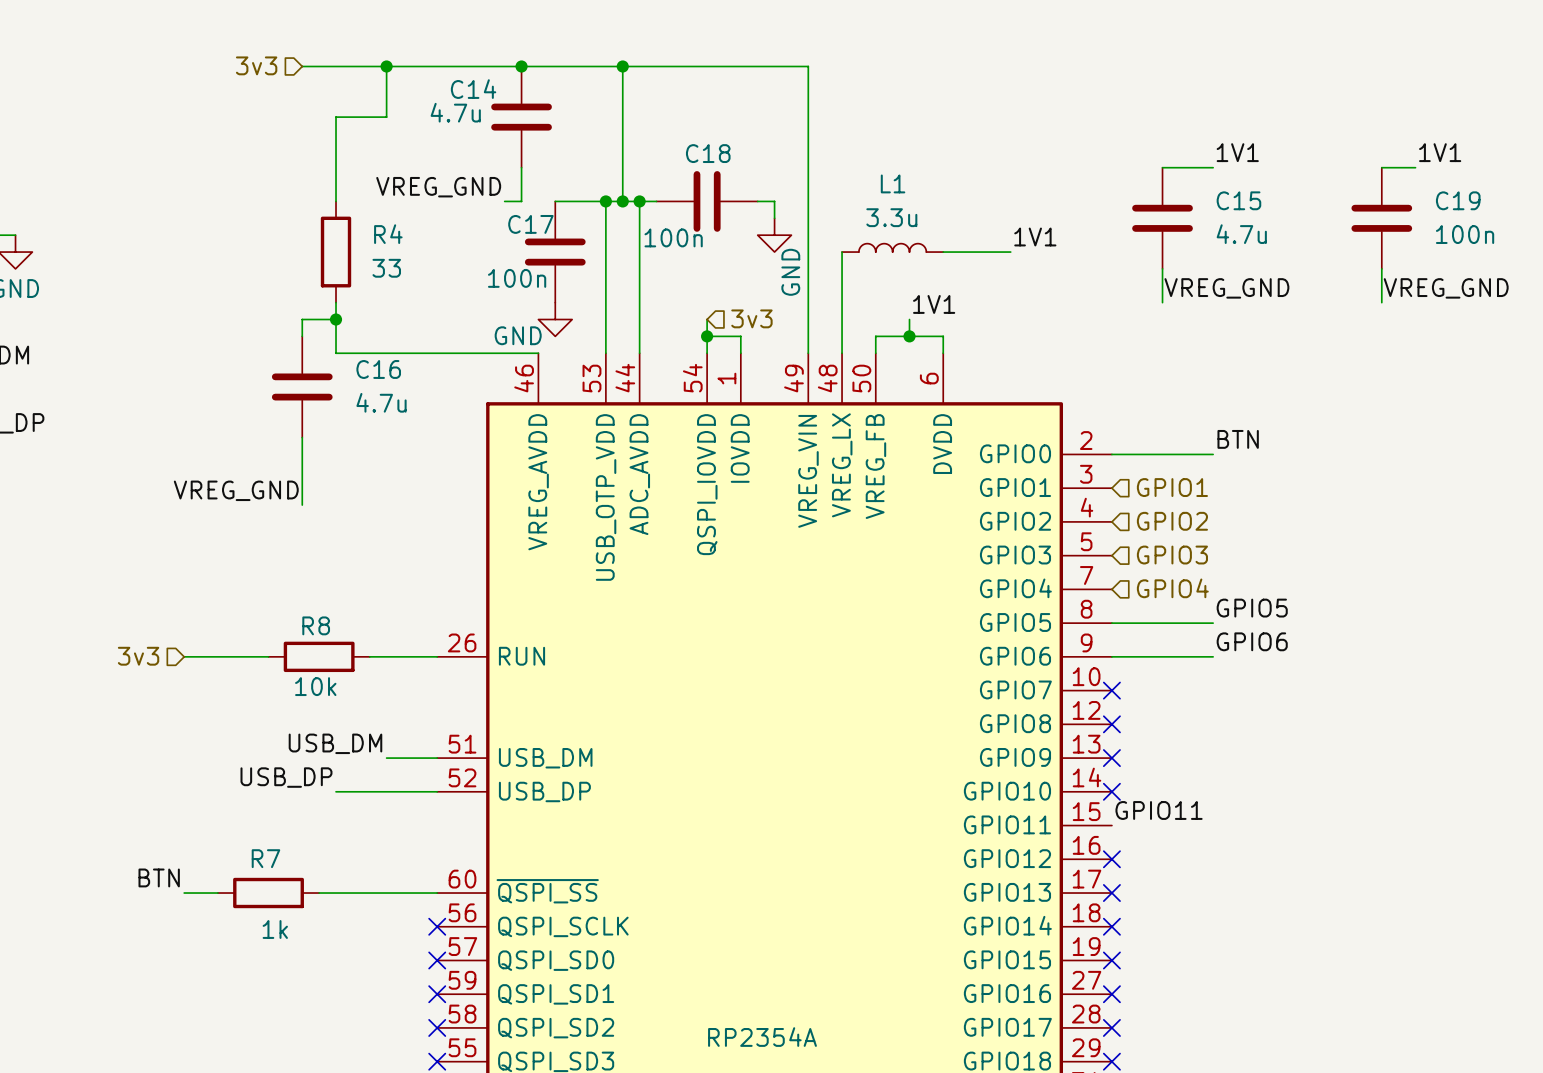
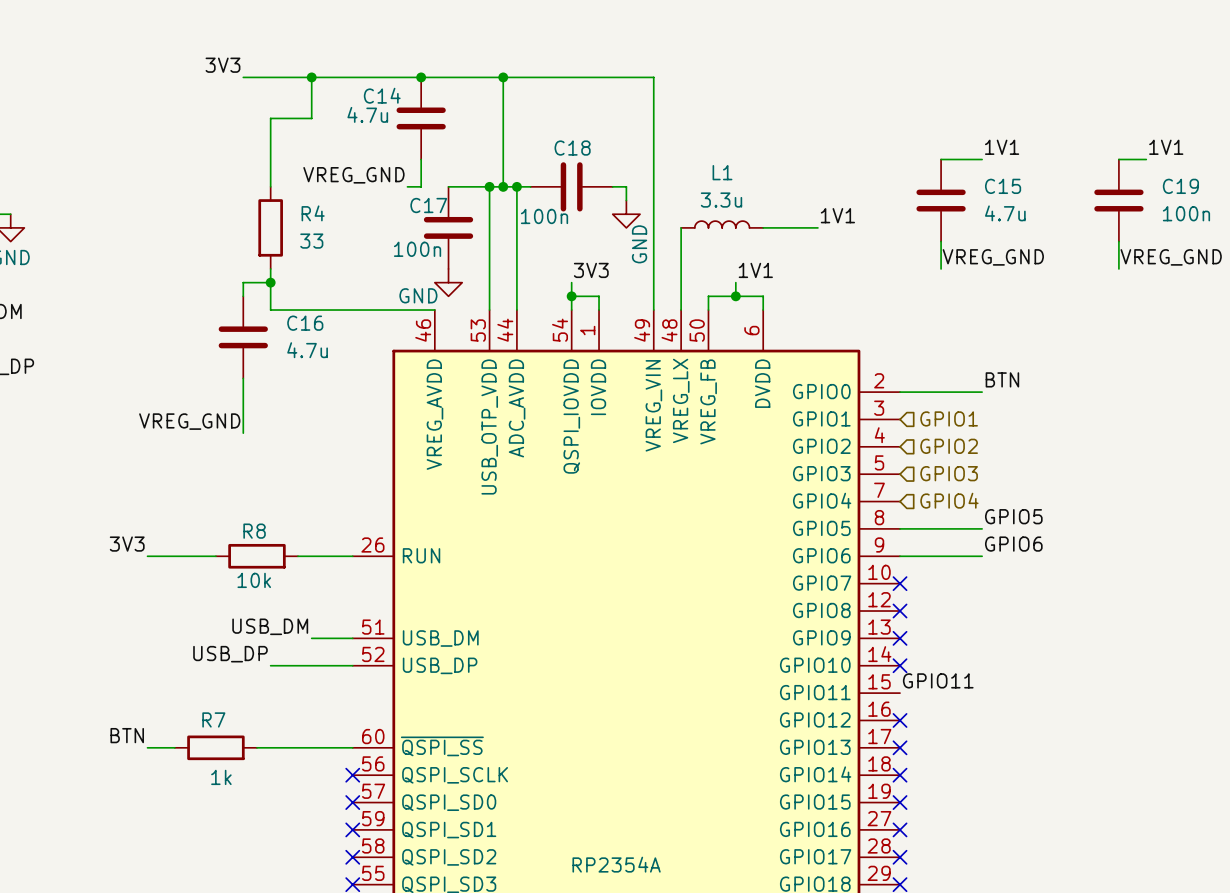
label: none -> 3V3 (222, 65)
hierarchical label: 3v3 (256, 65) -> none
label: none -> 3V3 (591, 270)
hierarchical label: 3v3 (751, 318) -> none
label: none -> 3V3 (127, 544)
hierarchical label: 3v3 (138, 656) -> none

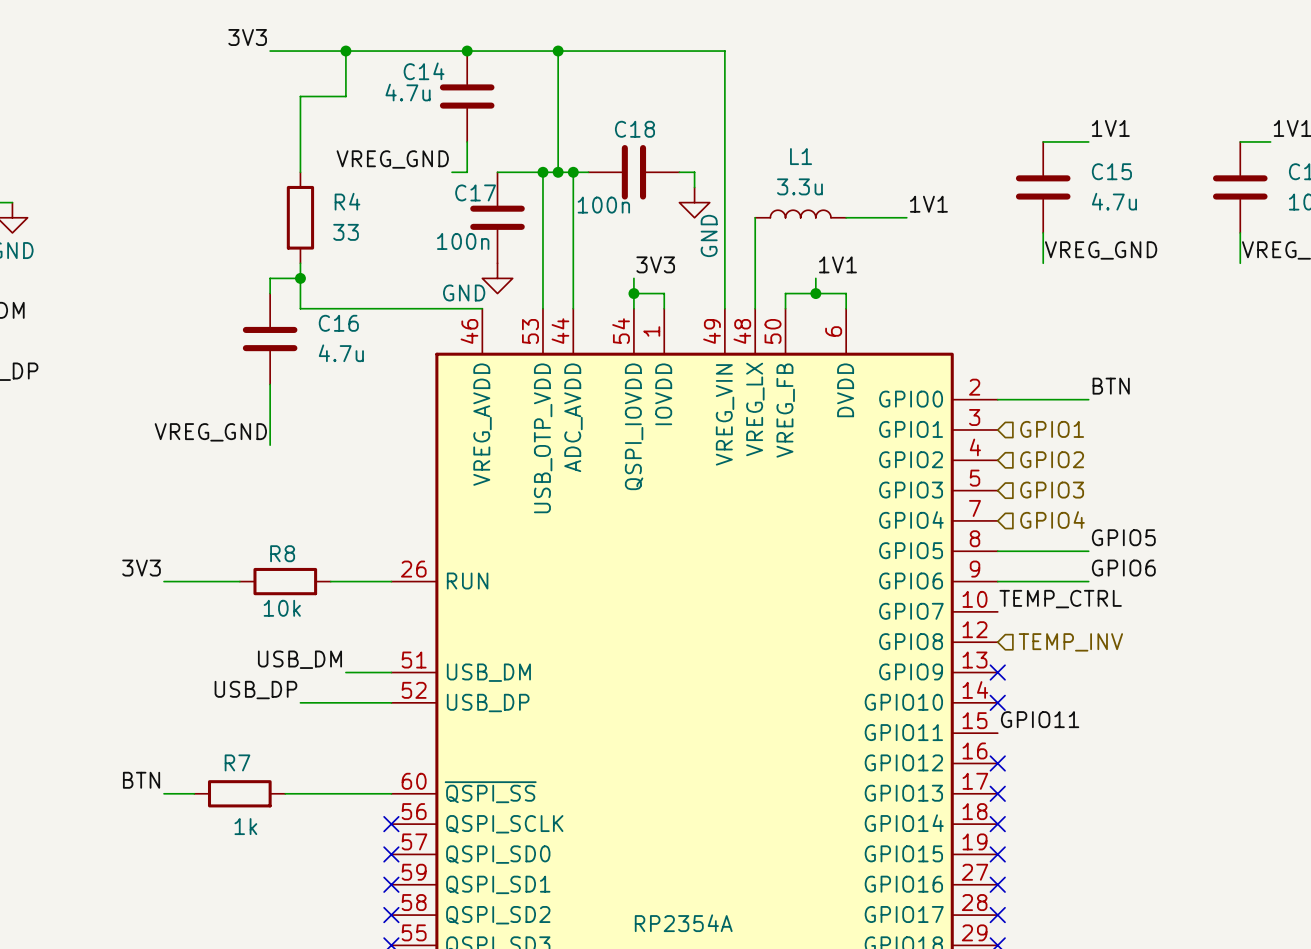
label: none -> TEMP_CTRL (1060, 599)
no-connect mark: (900, 583) -> none
no-connect mark: (900, 611) -> none
hierarchical label: none -> TEMP_INV (1070, 642)

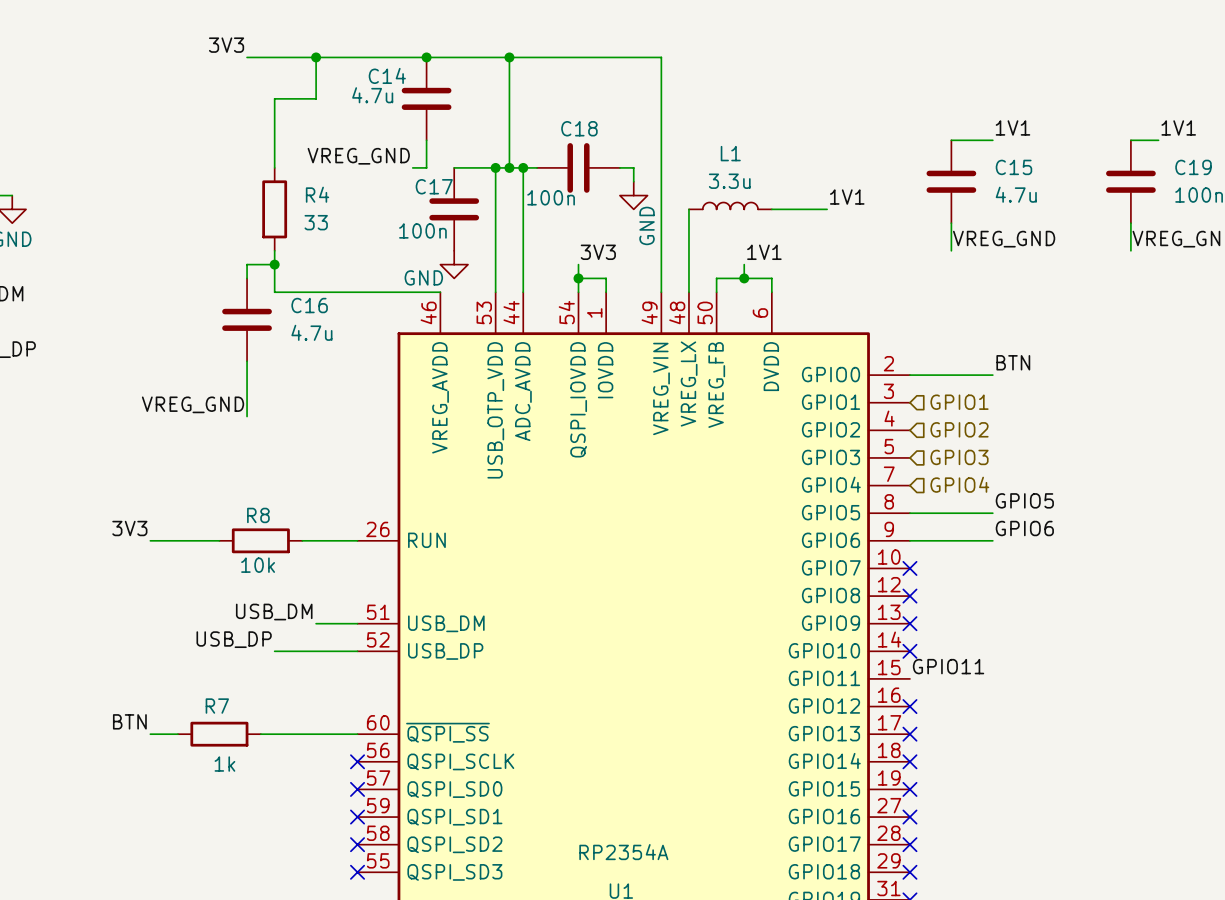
label: TEMP_CTRL (1060, 599) -> none
no-connect mark: none -> (909, 568)
no-connect mark: none -> (909, 596)
hierarchical label: TEMP_INV (1070, 642) -> none

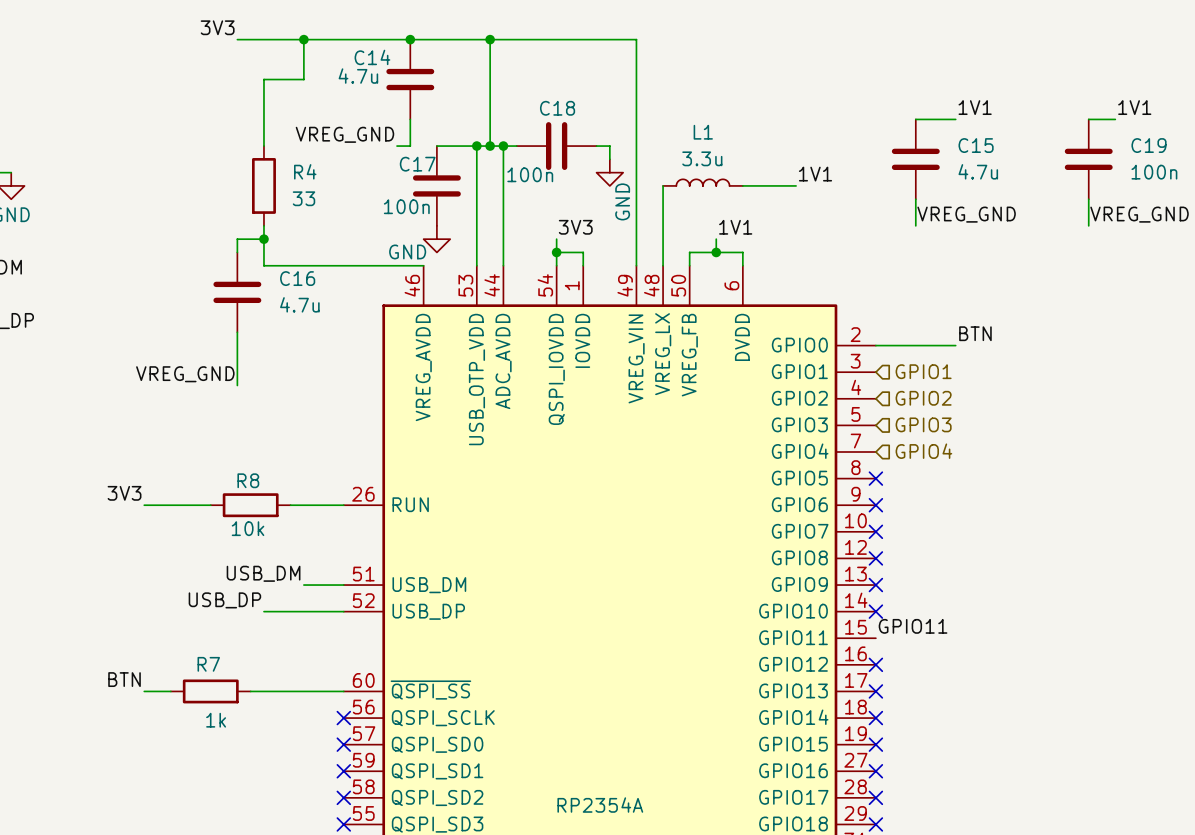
label: GPIO5 (1024, 500) -> none
wire: (909, 513) (992, 513) -> none
no-connect mark: none -> (875, 478)
label: GPIO6 (1024, 528) -> none
wire: (909, 540) (992, 540) -> none
no-connect mark: none -> (875, 505)

